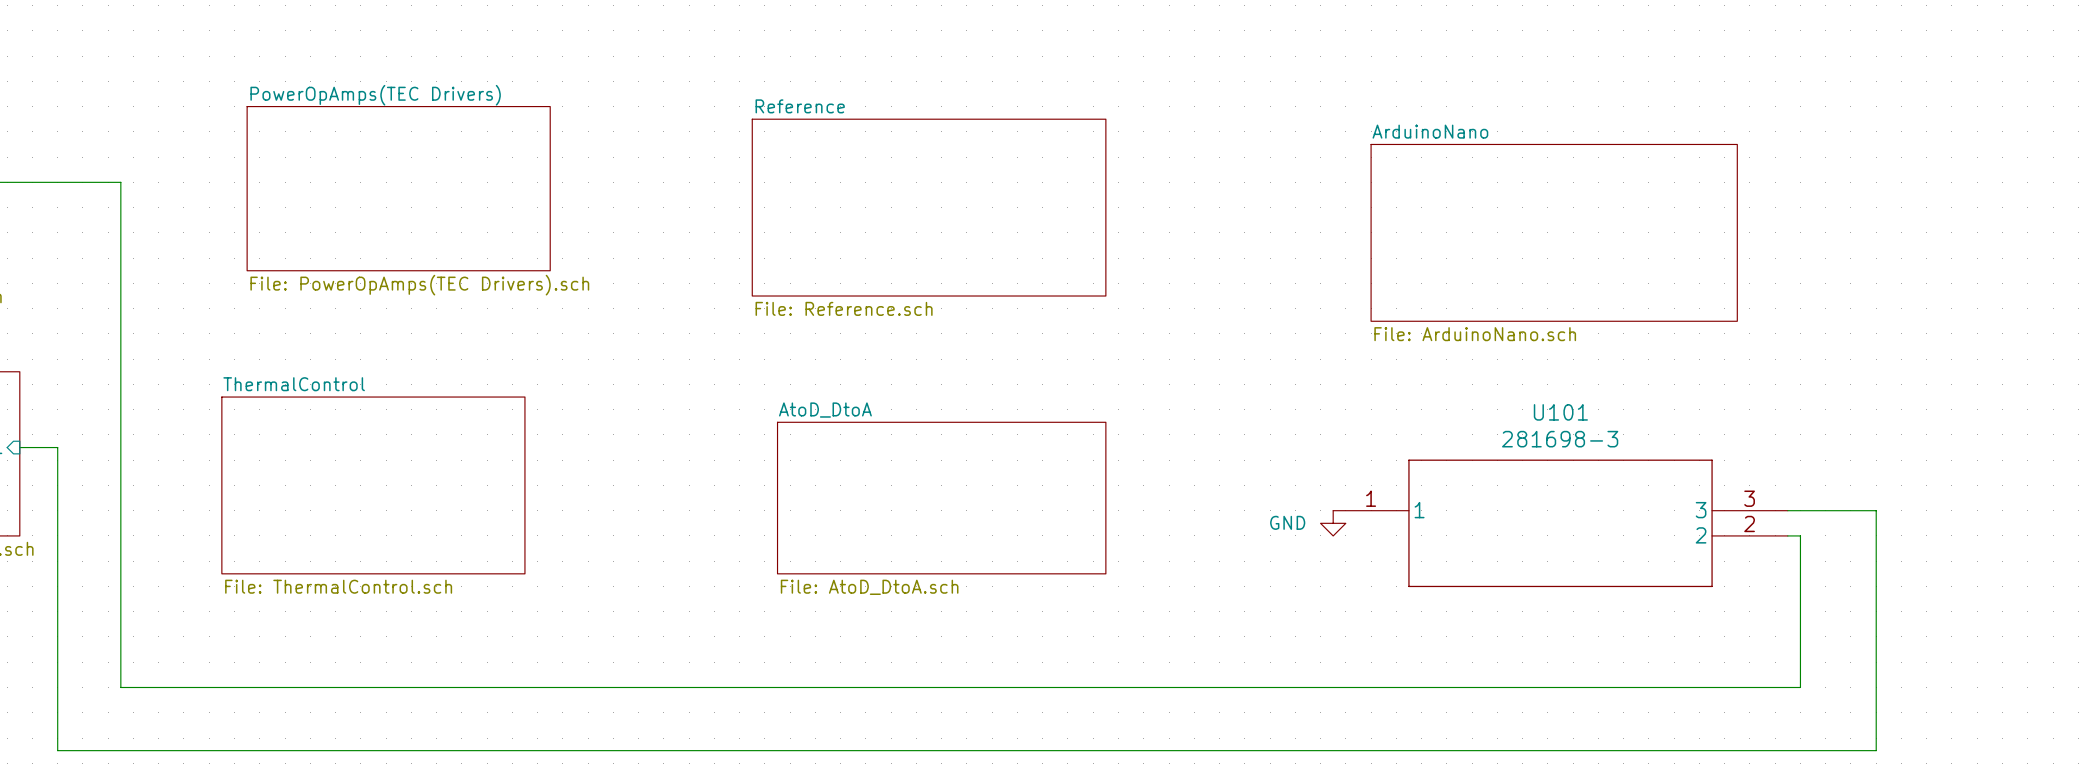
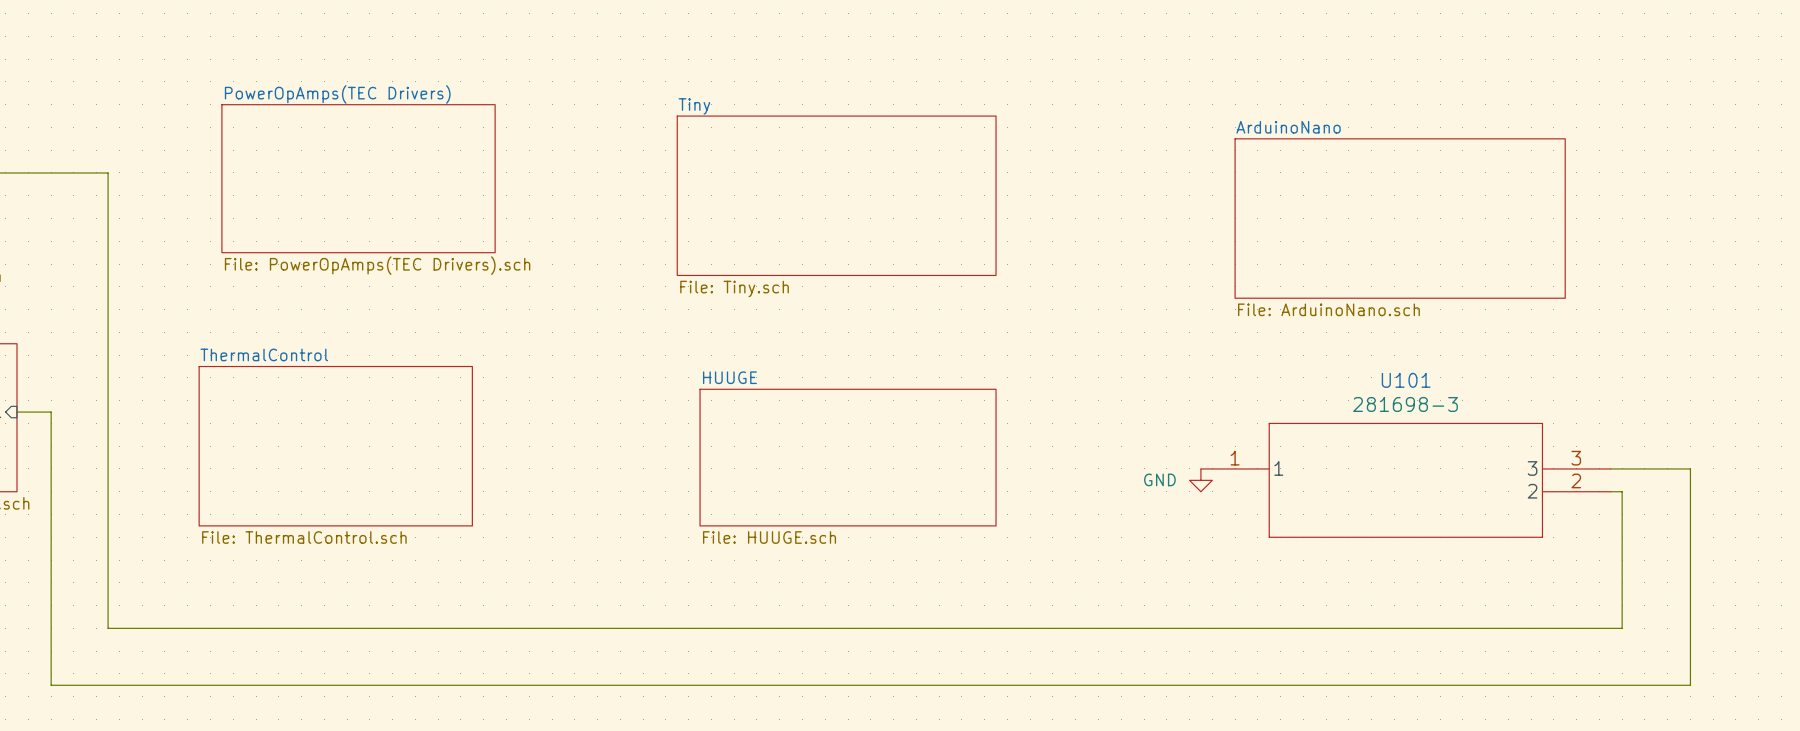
sheet Reference name: Reference (800, 106) -> Tiny (694, 106)
sheet Reference value: File: Reference.sch (844, 308) -> File: Tiny.sch (734, 288)
sheet AtoD_DtoA name: AtoD_DtoA (825, 410) -> HUUGE (729, 377)
sheet AtoD_DtoA value: File: AtoD_DtoA.sch (869, 587) -> File: HUUGE.sch (769, 537)

